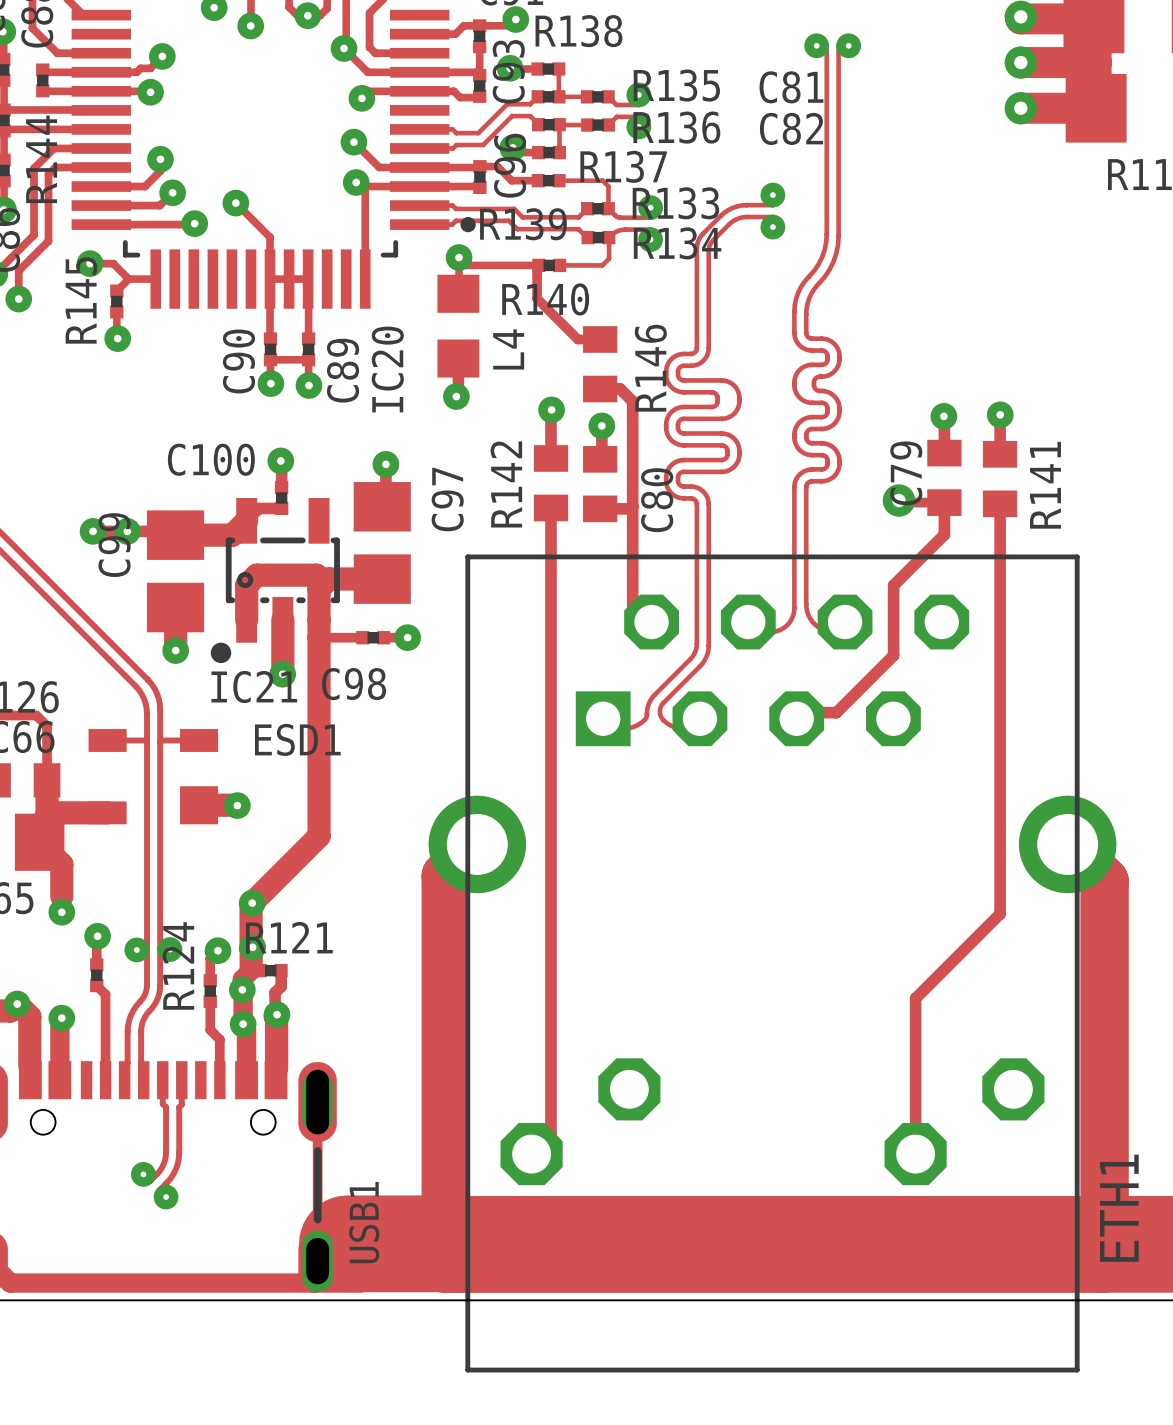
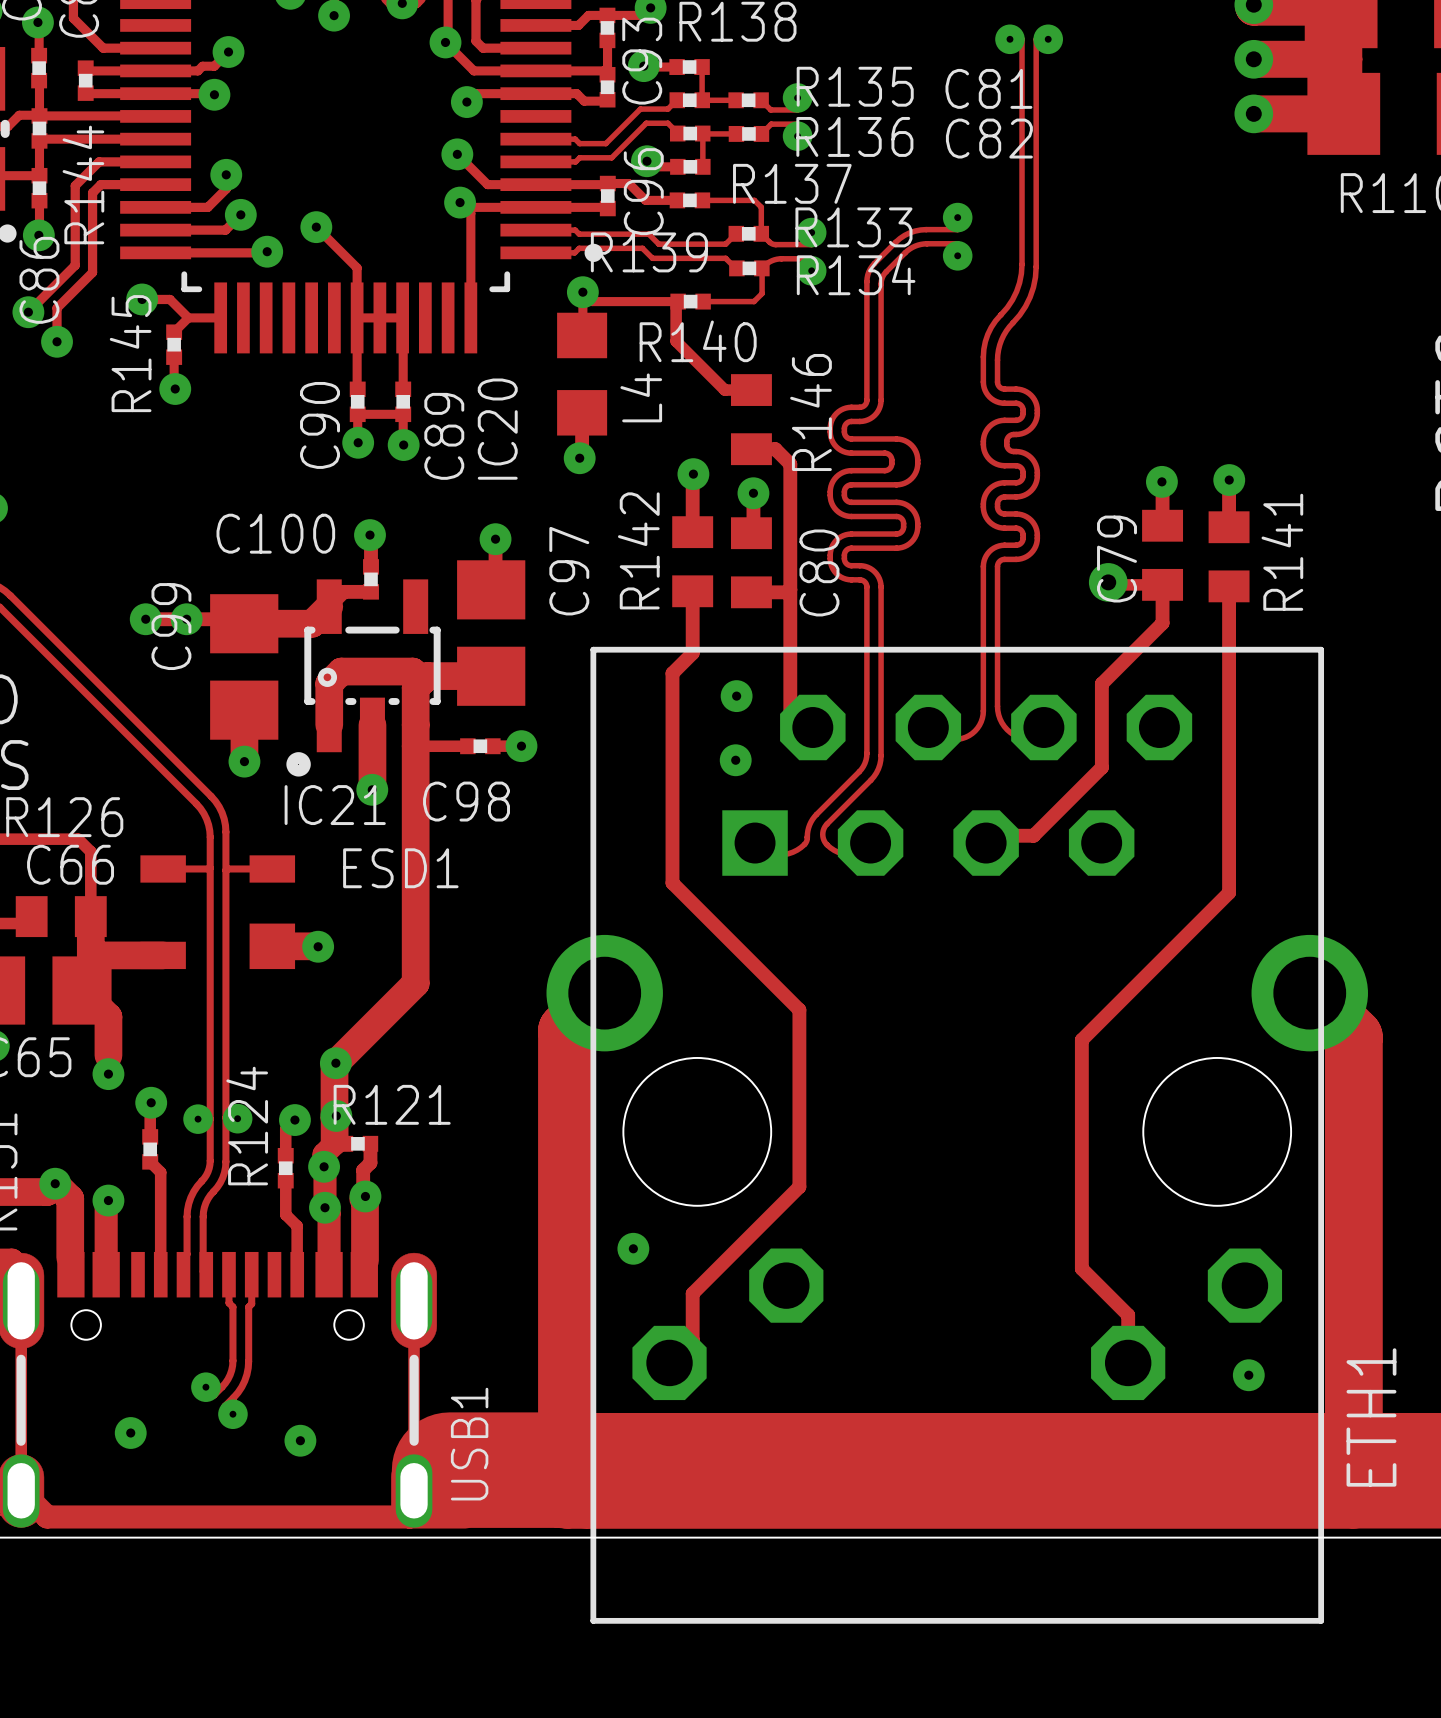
ETH1 footprint: [428, 554, 1117, 1373] -> [546, 646, 1368, 1624]
track: (550, 559) (550, 1096) -> (692, 653) (672, 673) (672, 883) (799, 1009) (799, 1186) (692, 1293)
via: none -> (736, 696)
via: none -> (735, 760)
track: (1000, 760) (1000, 913) (915, 998) (915, 1114) -> (1229, 892) (1081, 1039) (1081, 1268) (1128, 1315)
via: none -> (633, 1248)
via: none -> (1248, 1375)
via: none -> (130, 1433)
via: none -> (300, 1440)

